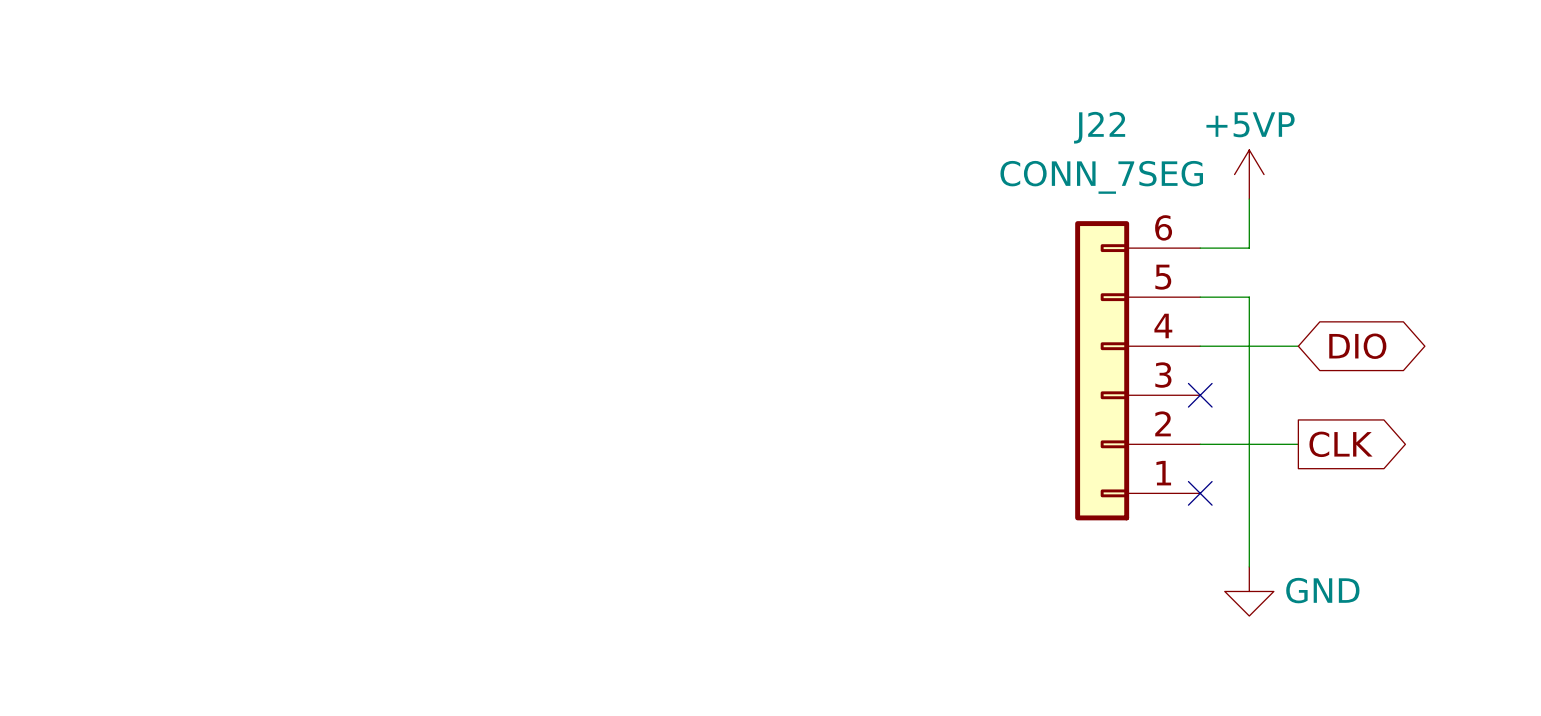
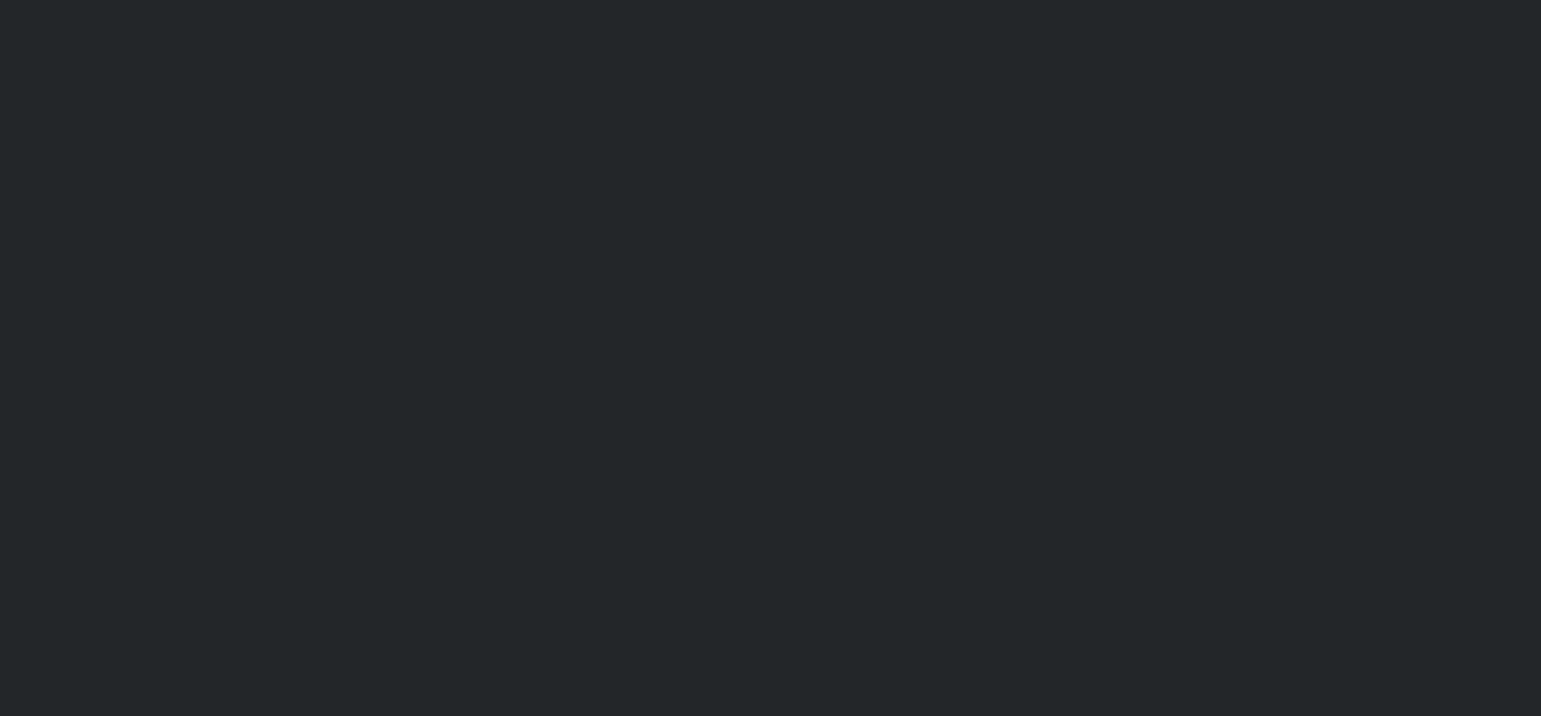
power symbol: +5VP (1249, 174) -> none
wire: (1249, 199) (1249, 248) (1200, 248) -> none
wire: (1200, 297) (1249, 297) (1249, 566) -> none
wire: (1200, 346) (1298, 346) -> none
global label: DIO (1357, 346) -> none
J22: CONN_7SEG (1137, 370) -> none
no-connect mark: (1200, 395) -> none
wire: (1200, 444) (1298, 444) -> none
global label: CLK (1341, 444) -> none
no-connect mark: (1200, 493) -> none
power symbol: GND (1249, 591) -> none

